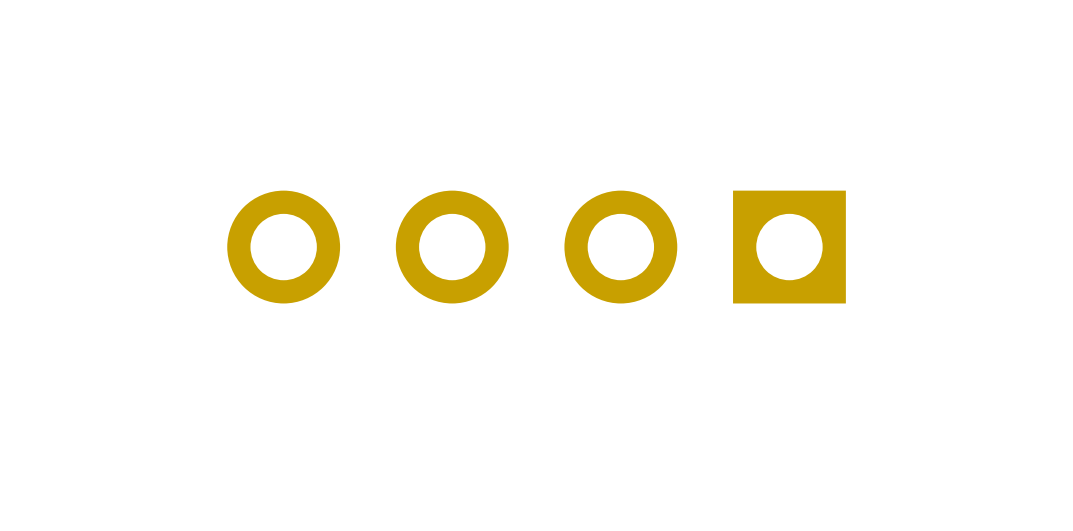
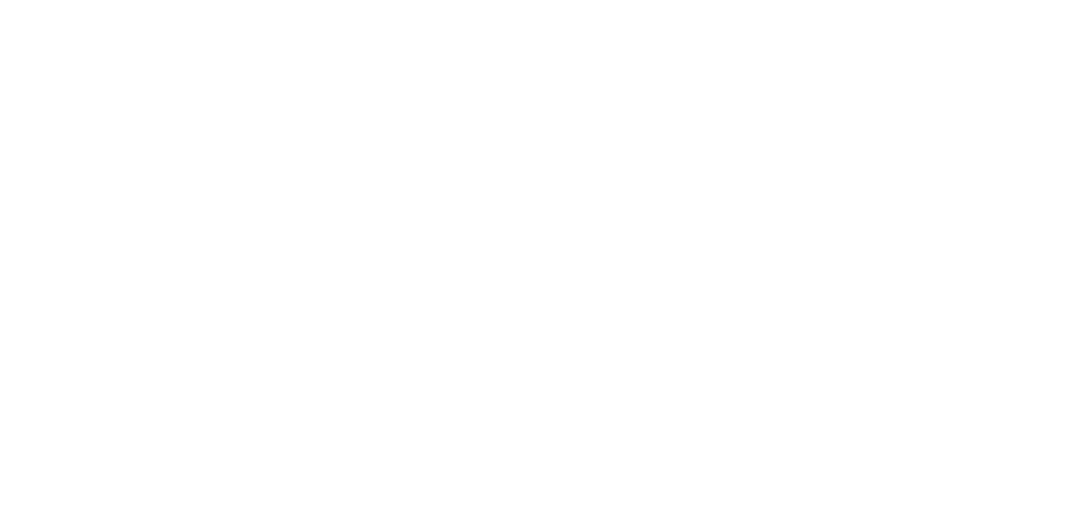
part: (536, 247) -> none

